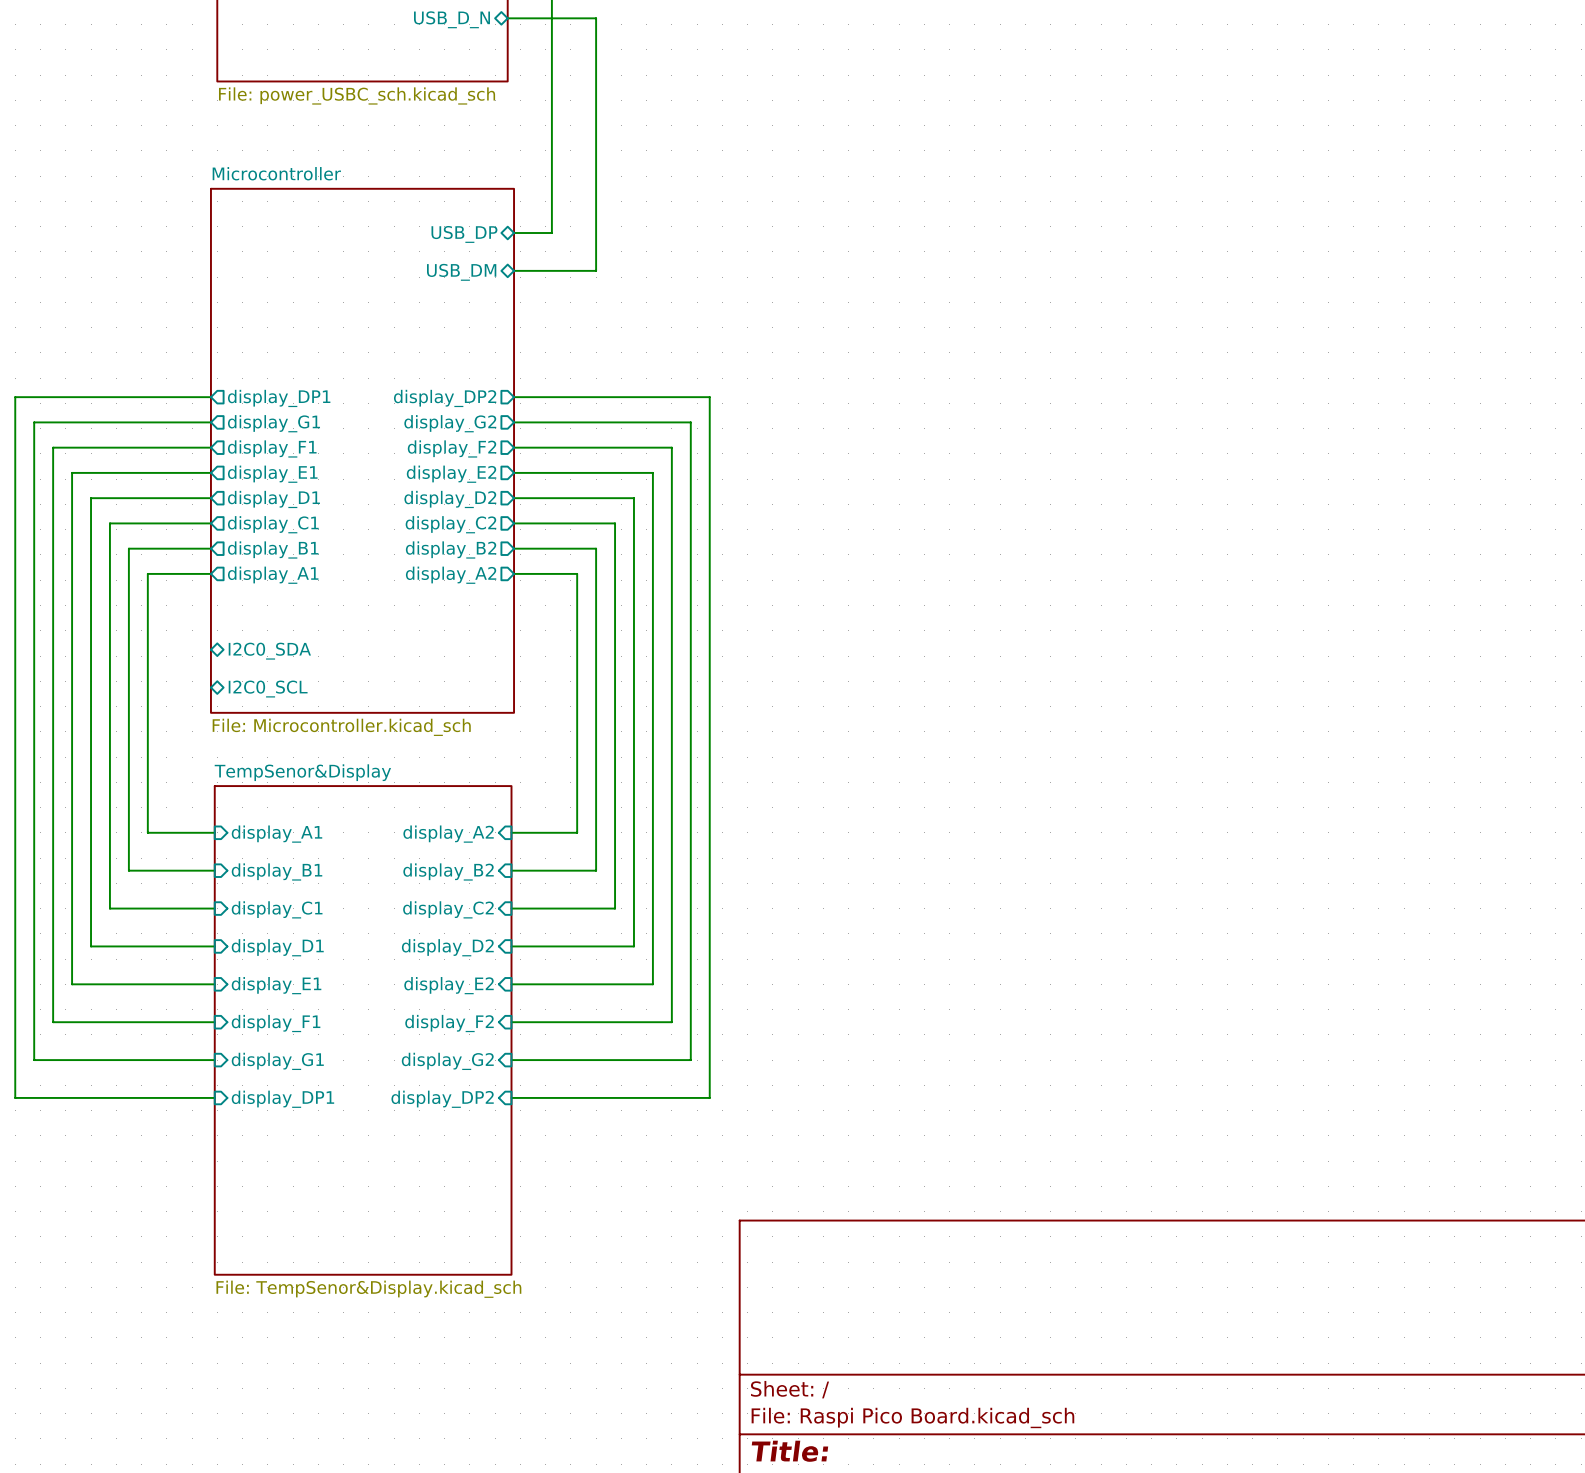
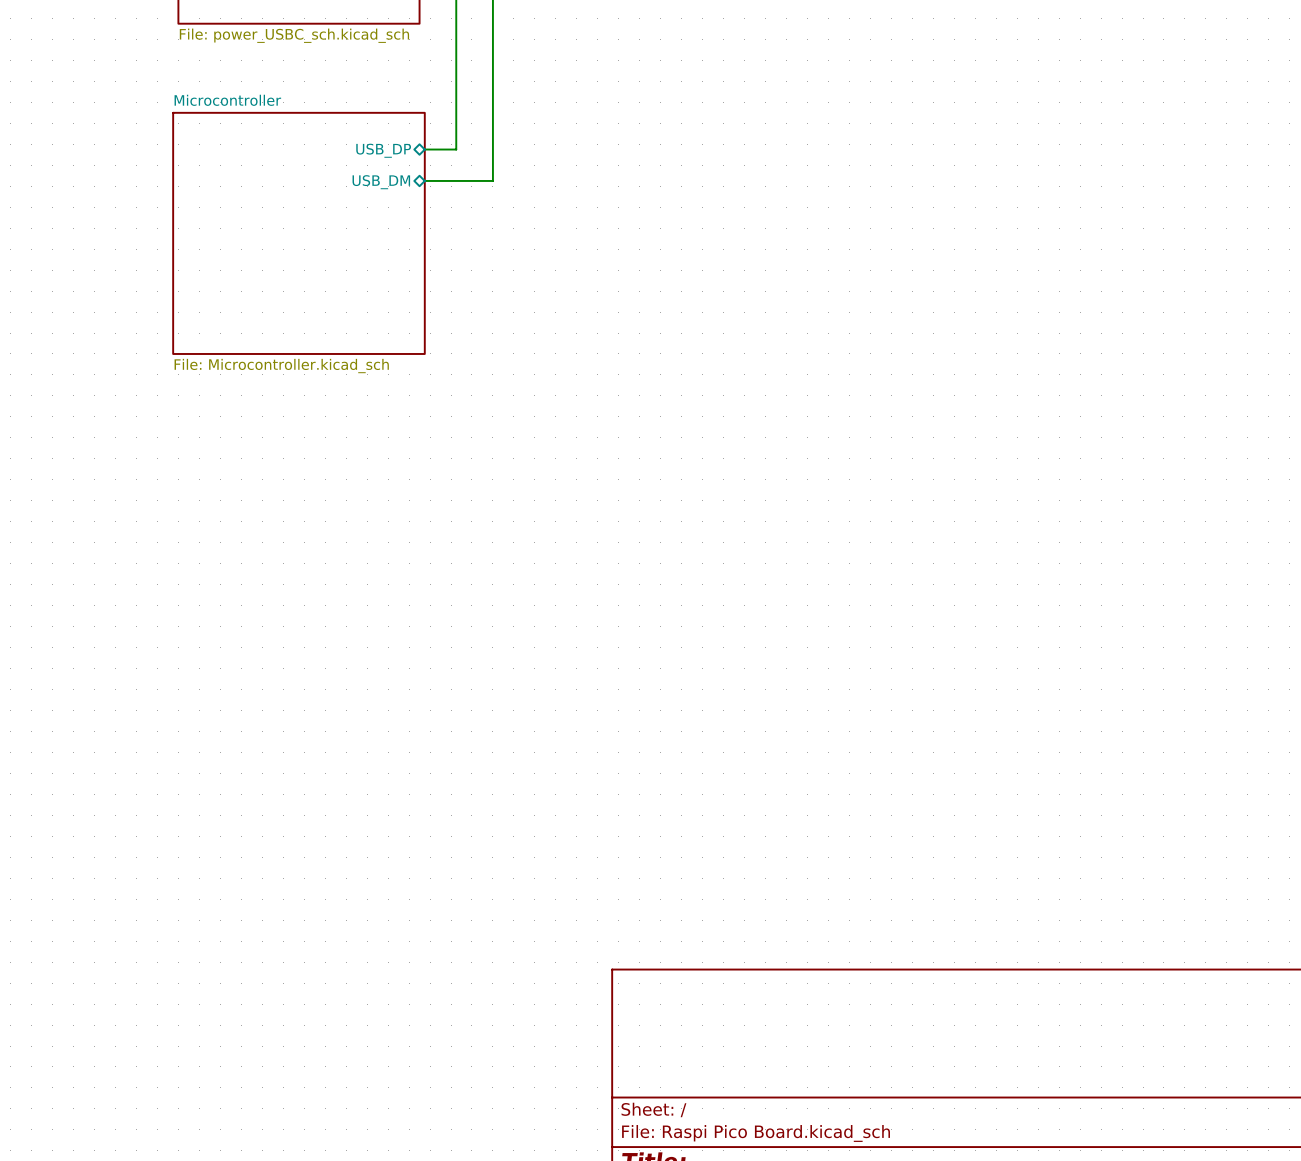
sheet Microcontroller: none -> File: Microcontroller.kicad_sch (298, 233)
wire: (210, 397) (15, 397) (15, 1097) (214, 1097) -> none
wire: (514, 397) (709, 397) (709, 1097) (511, 1097) -> none
sheet pin: display_DP1 (279, 398) -> none
sheet pin: display_DP2 (445, 398) -> none
wire: (210, 422) (34, 422) (34, 1060) (214, 1060) -> none
wire: (514, 422) (690, 422) (690, 1060) (511, 1060) -> none
sheet pin: display_G1 (273, 423) -> none
sheet pin: display_G2 (450, 423) -> none
wire: (210, 447) (53, 447) (53, 1022) (214, 1022) -> none
wire: (514, 447) (671, 447) (671, 1022) (511, 1022) -> none
sheet pin: display_F1 (272, 448) -> none
sheet pin: display_F2 (452, 448) -> none
sheet Microcontroller: File: Microcontroller.kicad_sch (362, 450) -> none
wire: (210, 472) (72, 472) (72, 984) (214, 984) -> none
wire: (514, 472) (652, 472) (652, 984) (511, 984) -> none
sheet pin: display_E1 (272, 474) -> none
sheet pin: display_E2 (451, 474) -> none
wire: (210, 498) (91, 498) (91, 946) (214, 946) -> none
wire: (514, 498) (633, 498) (633, 946) (511, 946) -> none
sheet pin: display_D1 (273, 499) -> none
sheet pin: display_D2 (450, 499) -> none
wire: (210, 523) (109, 523) (109, 908) (214, 908) -> none
wire: (514, 523) (615, 523) (615, 908) (511, 908) -> none
sheet pin: display_C1 (273, 524) -> none
sheet pin: display_C2 (450, 524) -> none
wire: (210, 548) (128, 548) (128, 870) (214, 870) -> none
wire: (514, 548) (596, 548) (596, 870) (511, 870) -> none
sheet pin: display_B1 (273, 549) -> none
sheet pin: display_B2 (451, 549) -> none
wire: (210, 573) (147, 573) (147, 832) (214, 832) -> none
wire: (514, 573) (577, 573) (577, 832) (511, 832) -> none
sheet pin: display_A1 (273, 575) -> none
sheet pin: display_A2 (451, 575) -> none
sheet pin: I2C0_SDA (269, 651) -> none
sheet pin: I2C0_SCL (268, 689) -> none
sheet pin: display_A1 (276, 834) -> none
sheet pin: display_A2 (448, 834) -> none
sheet pin: display_B1 (277, 871) -> none
sheet pin: display_B2 (448, 871) -> none
sheet pin: display_C1 (277, 909) -> none
sheet pin: display_C2 (448, 909) -> none
sheet pin: display_D1 (277, 947) -> none
sheet pin: display_D2 (447, 947) -> none
sheet pin: display_E1 (276, 985) -> none
sheet pin: display_E2 (449, 985) -> none
sheet pin: display_F1 (276, 1023) -> none
sheet pin: display_F2 (449, 1023) -> none
sheet TempSenor&Display: File: TempSenor&Display.kicad_sch (363, 1030) -> none
sheet pin: display_G1 (277, 1061) -> none
sheet pin: display_G2 (447, 1061) -> none
sheet pin: display_DP1 (282, 1099) -> none
sheet pin: display_DP2 (442, 1099) -> none

